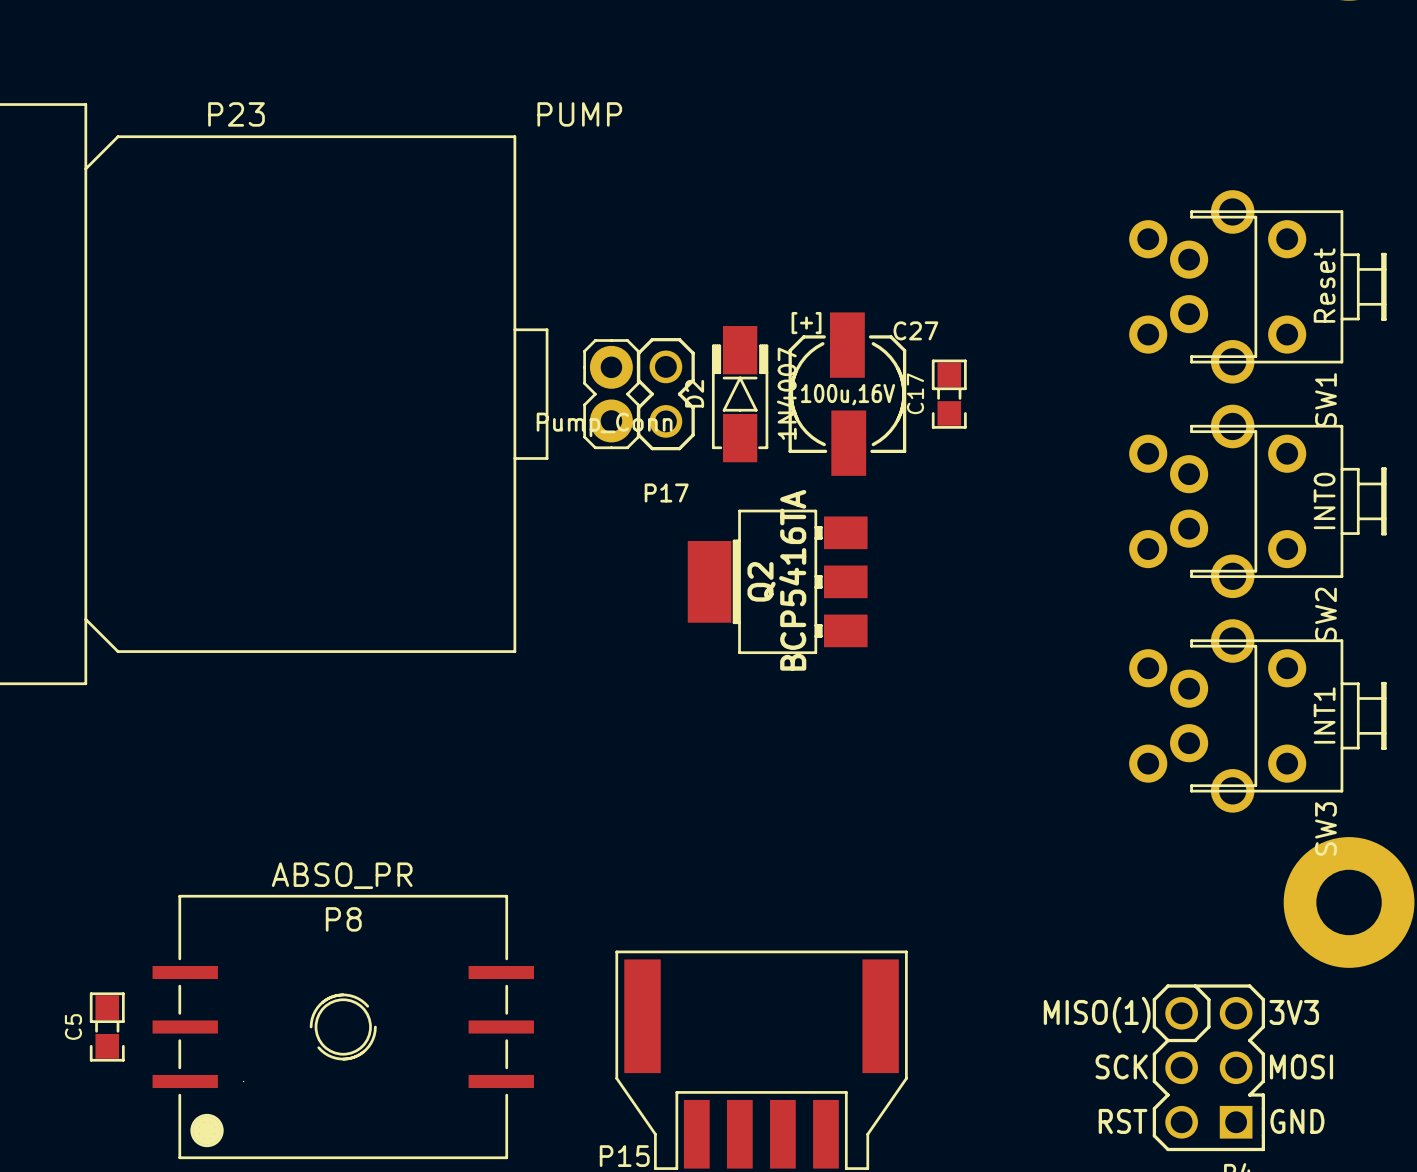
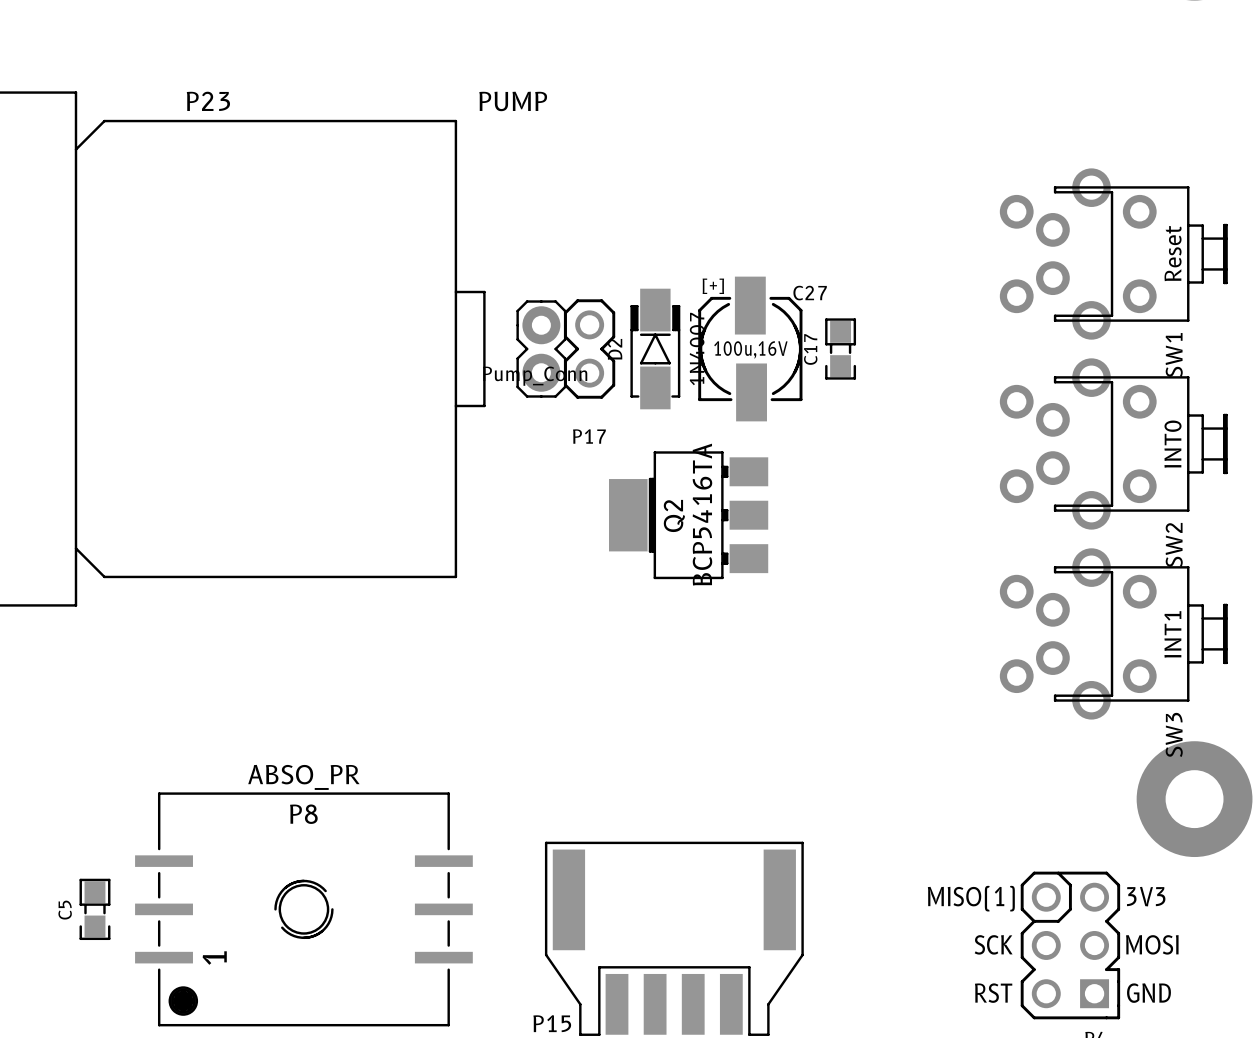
P8 footprint: [152, 894, 534, 1160] -> [135, 792, 473, 1027]

